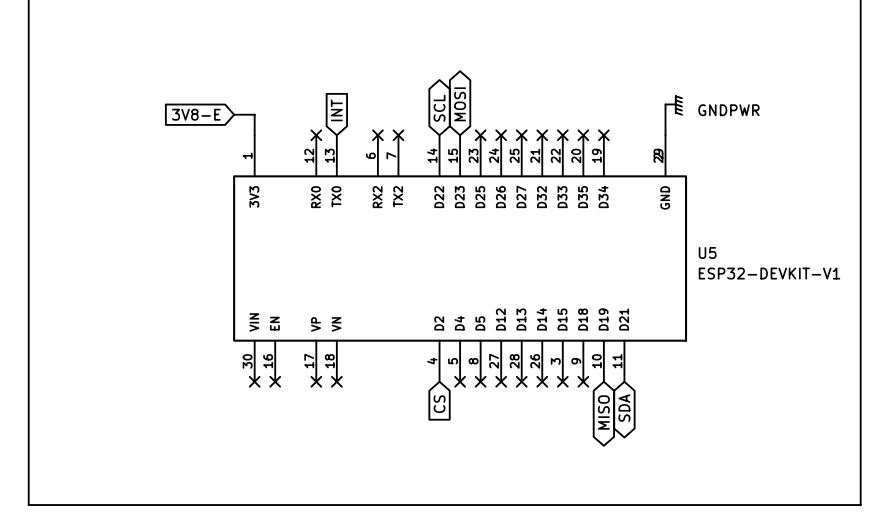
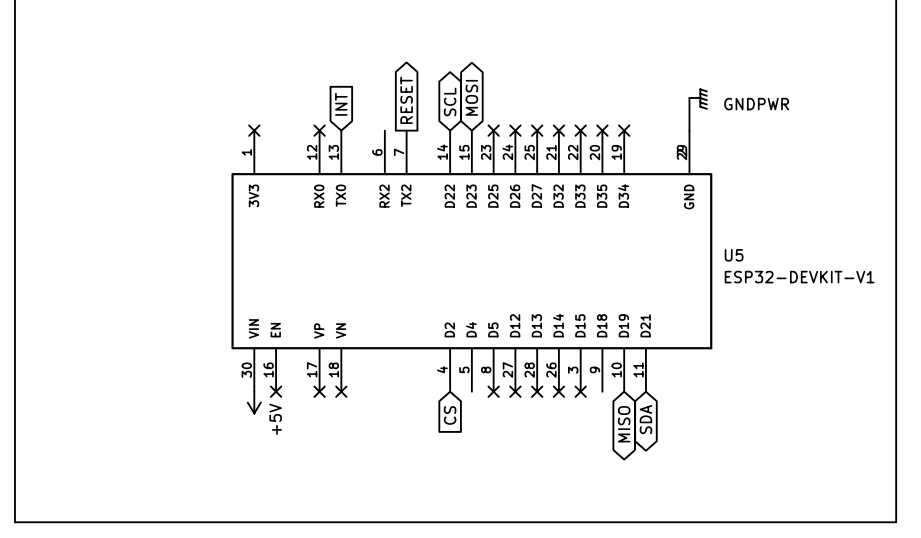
global label: none -> RESET (406, 100)
global label: 3V8-E (196, 114) -> none
wire: (234, 114) (254, 114) (254, 135) -> none
no-connect mark: none -> (254, 130)
no-connect mark: (377, 135) -> none
no-connect mark: (398, 135) -> none
no-connect mark: (254, 381) -> none
no-connect mark: (460, 381) -> none
no-connect mark: (583, 381) -> none
power symbol: none -> +5V (254, 402)

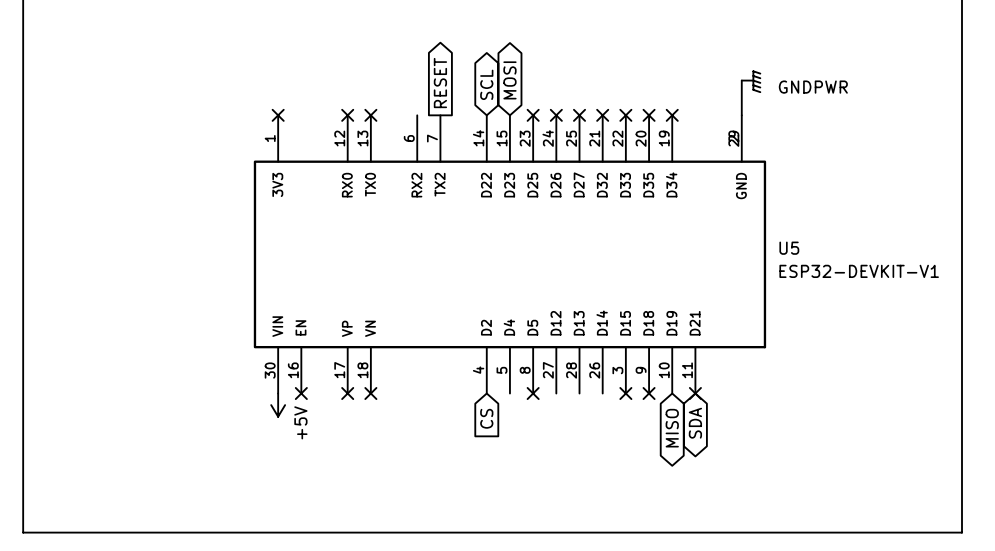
global label: INT (341, 104) -> none
no-connect mark: none -> (370, 115)
no-connect mark: (515, 391) -> none
no-connect mark: (537, 391) -> none
no-connect mark: (558, 391) -> none
no-connect mark: none -> (649, 393)
no-connect mark: none -> (695, 393)

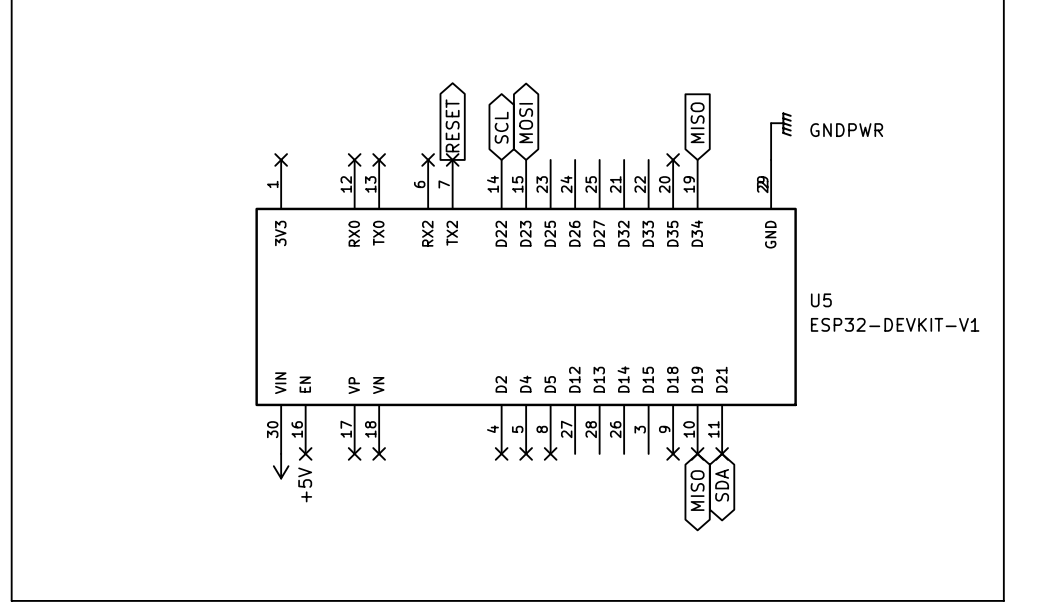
global label: none -> MISO (697, 122)
no-connect mark: none -> (428, 159)
no-connect mark: none -> (452, 159)
no-connect mark: (533, 115) -> none
no-connect mark: (556, 115) -> none
no-connect mark: (579, 115) -> none
no-connect mark: (602, 115) -> none
no-connect mark: (625, 115) -> none
no-connect mark: (672, 115) -> none
no-connect mark: none -> (501, 453)
no-connect mark: none -> (526, 453)
no-connect mark position: (625, 393) -> (697, 453)
global label: CS (486, 418) -> none

